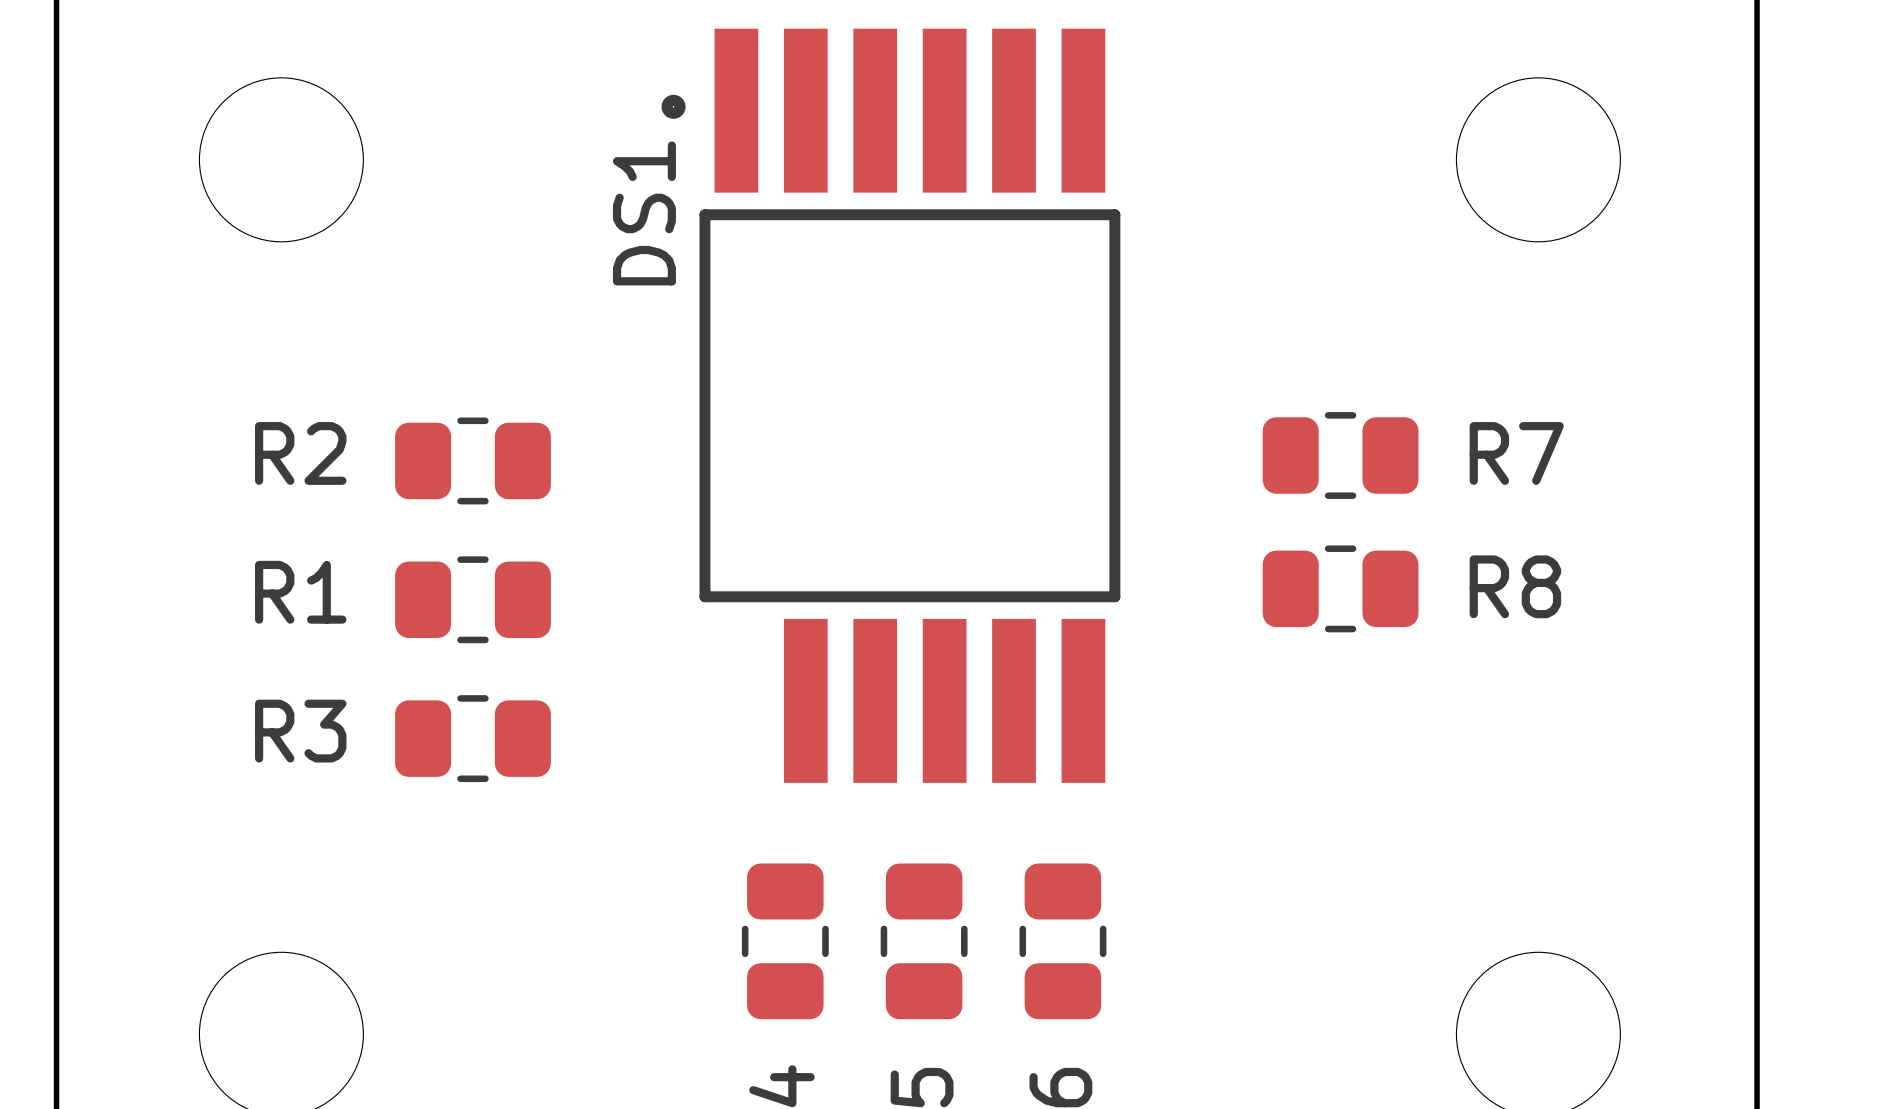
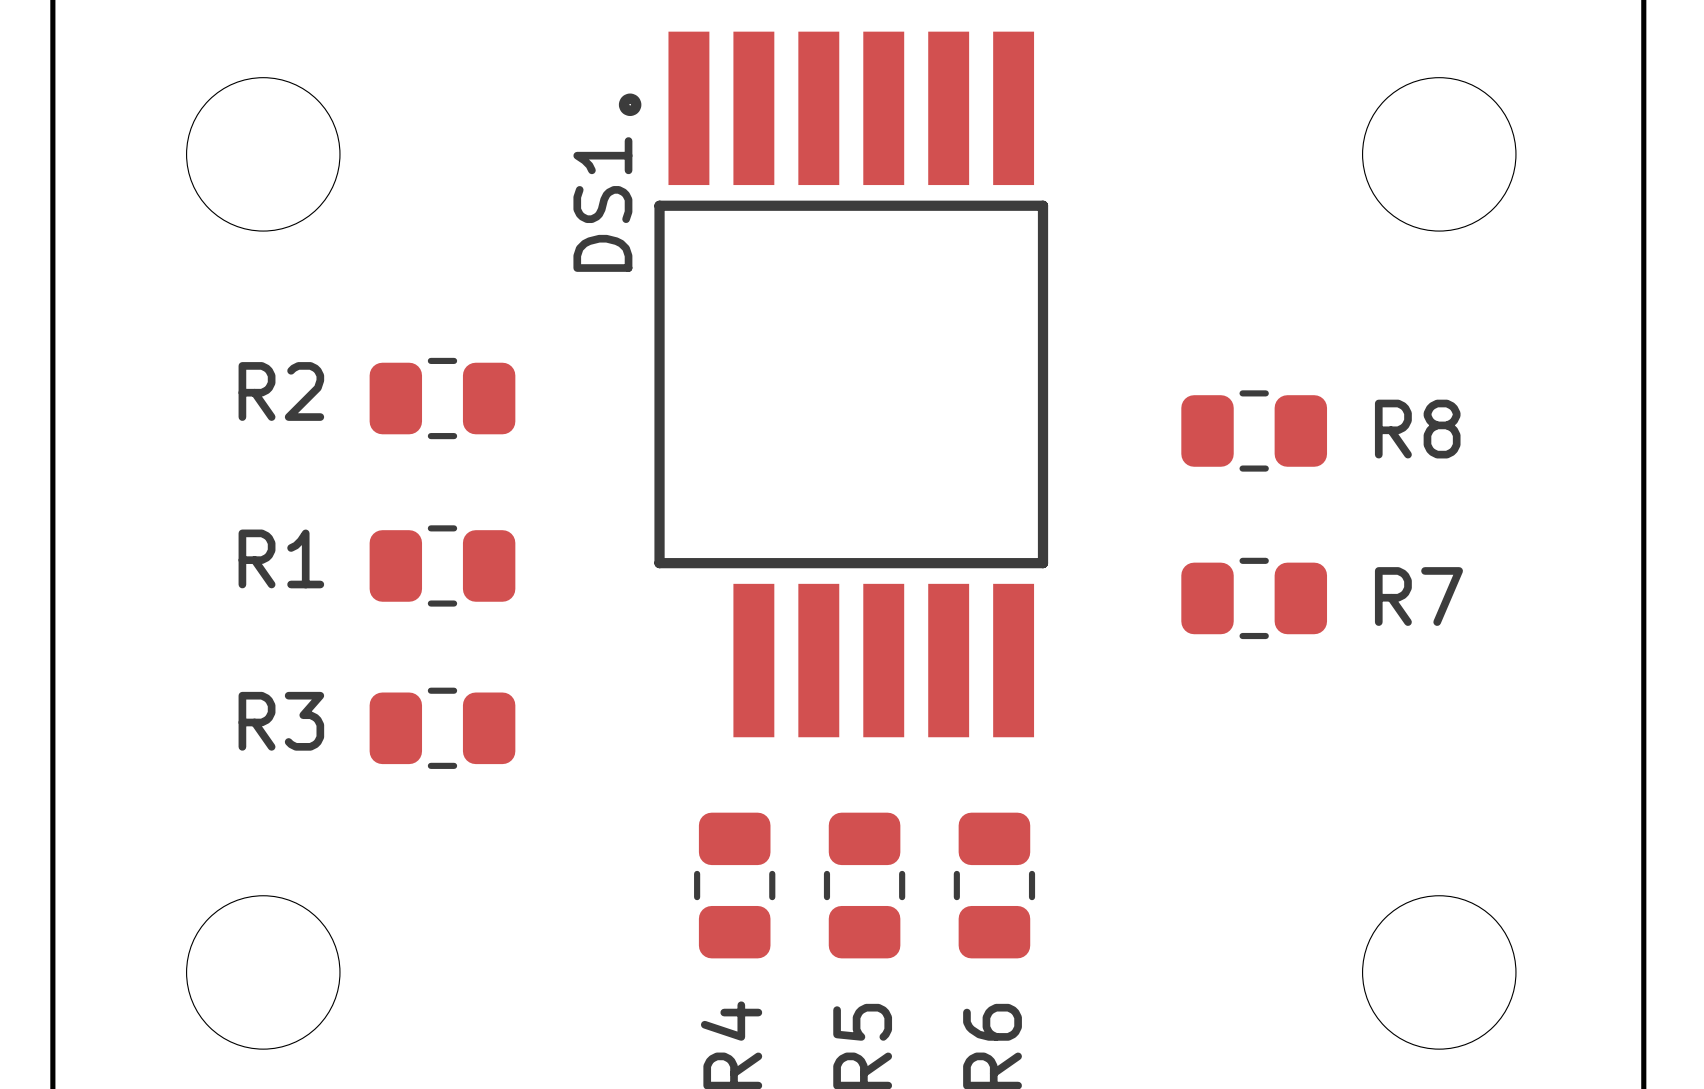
R7 name: R7 (1516, 453) -> R8 (1417, 429)
R2 position: (472, 460) -> (442, 398)
R8 name: R8 (1515, 586) -> R7 (1418, 596)
R8 position: (1340, 588) -> (1254, 598)
R3 position: (472, 738) -> (442, 728)

